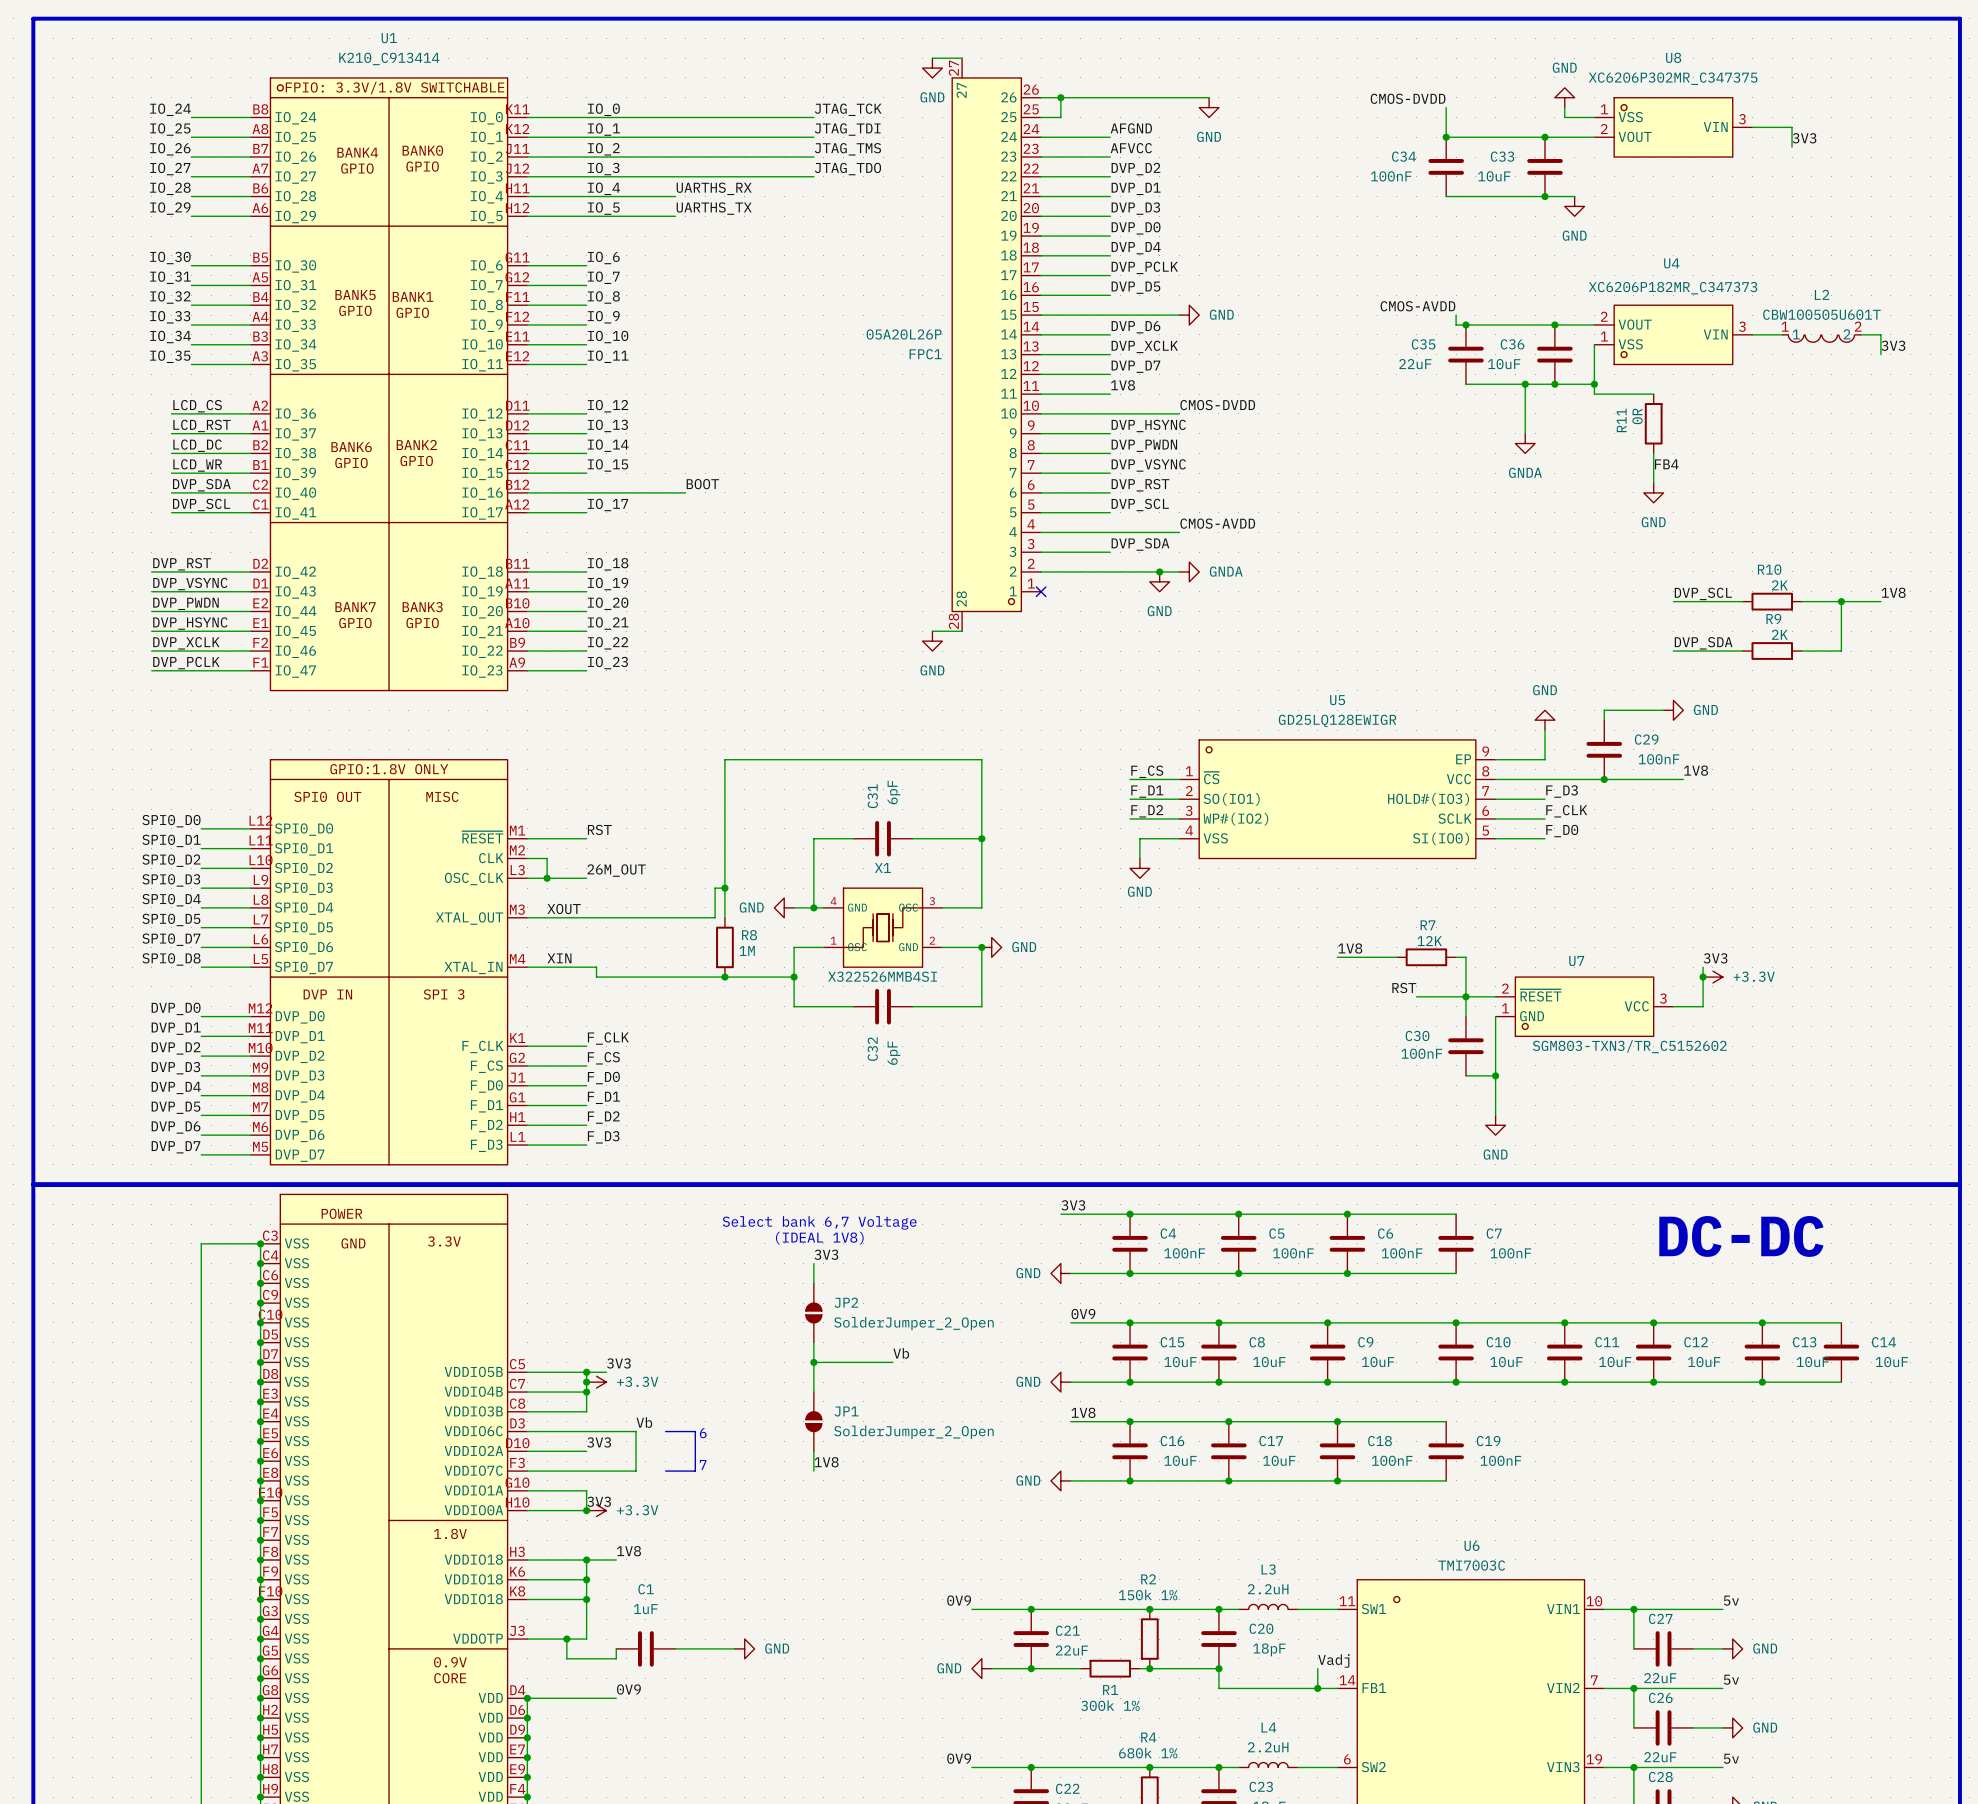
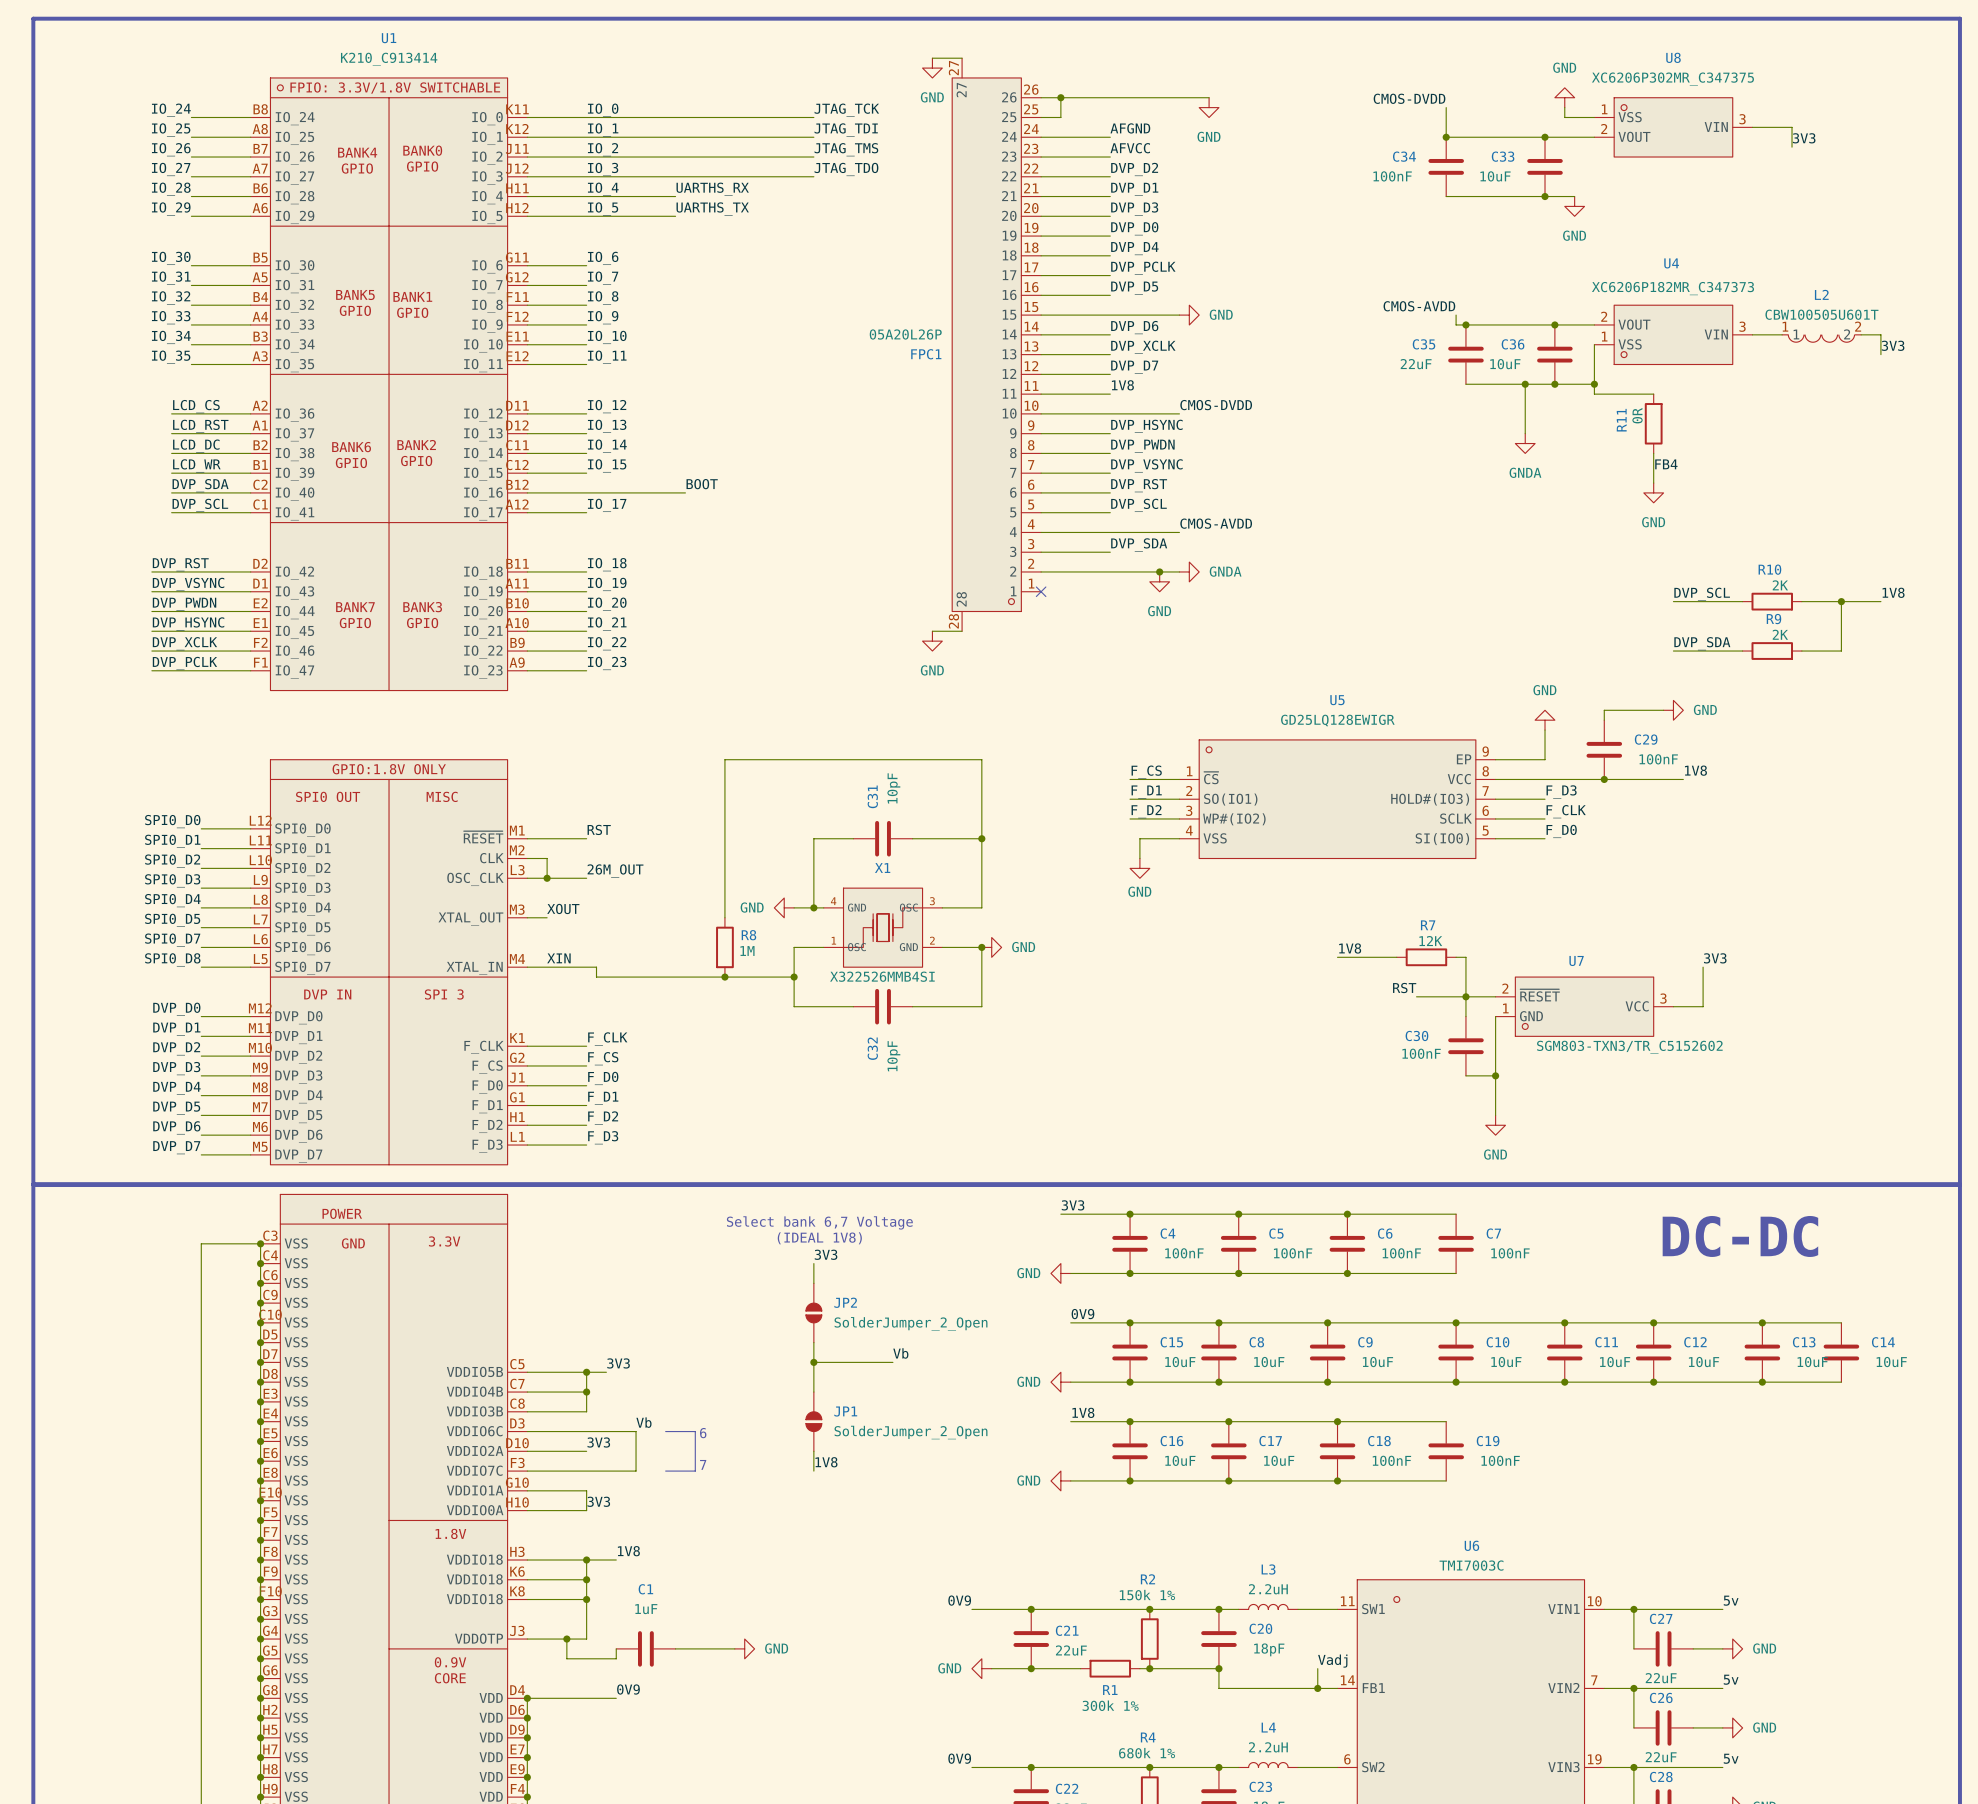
C31 value: 6pF (893, 792) -> 10pF (893, 788)
wire: (724, 888) (715, 888) (715, 917) (547, 917) -> none
junction: (724, 888) -> none
junction: (1703, 977) -> none
power symbol: +3.3V (1712, 977) -> none
C32 value: 6pF (893, 1053) -> 10pF (893, 1056)
junction: (586, 1382) -> none
power symbol: +3.3V (596, 1382) -> none
junction: (586, 1510) -> none
power symbol: +3.3V (596, 1510) -> none

